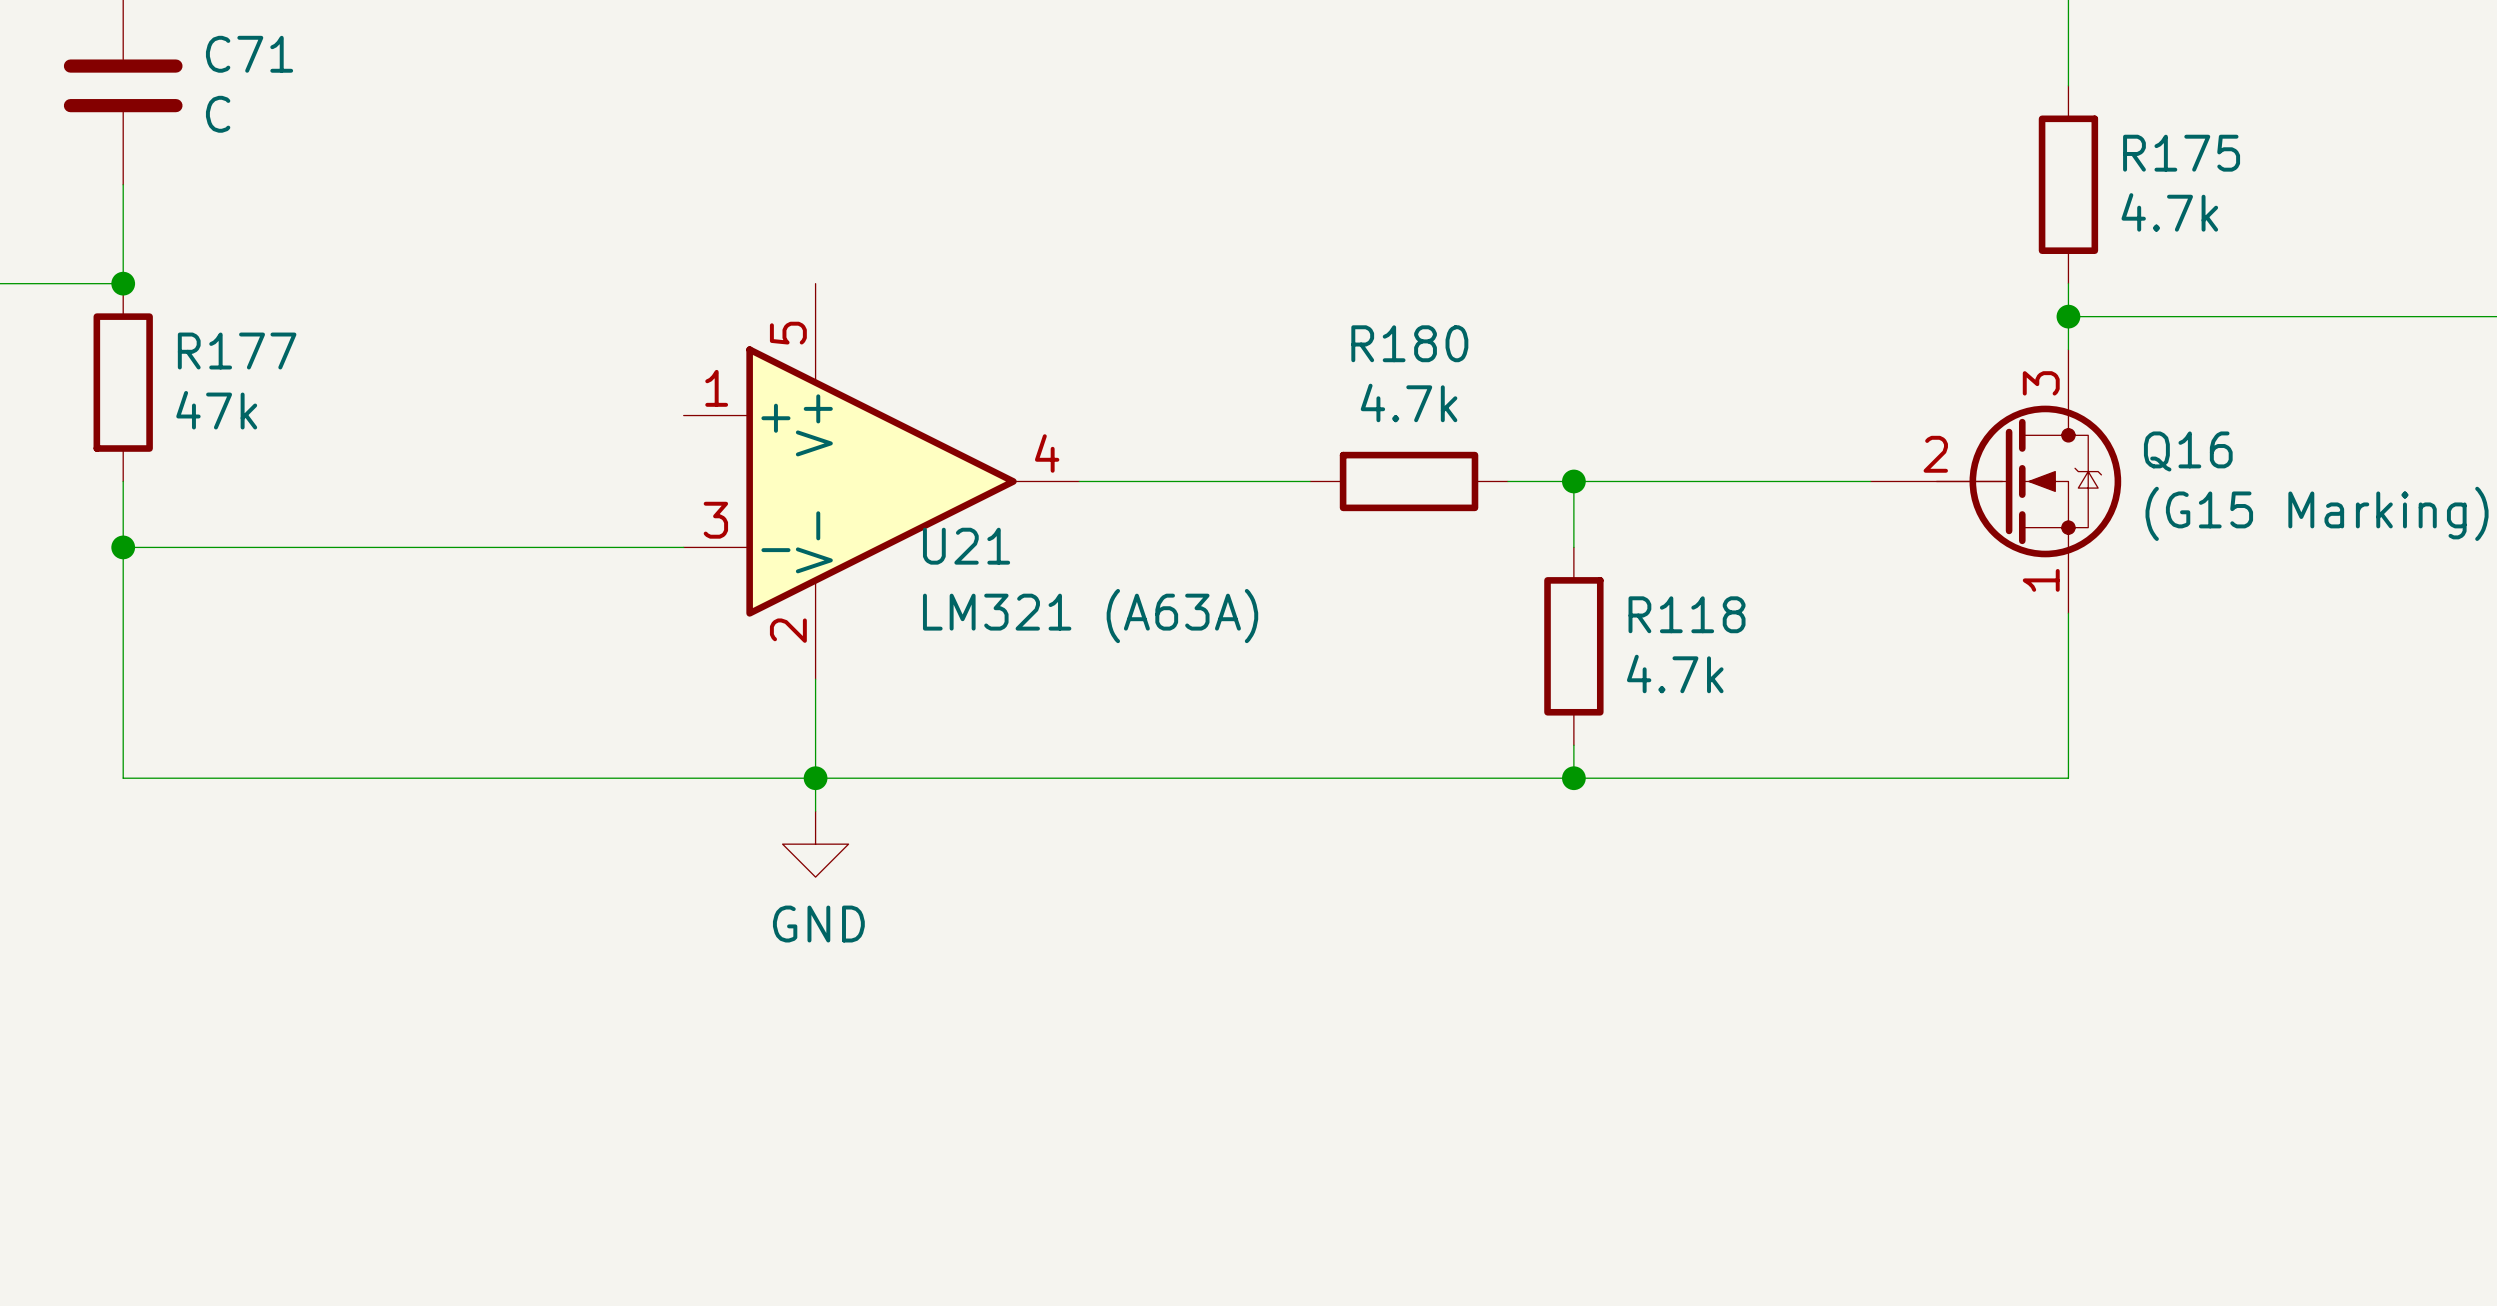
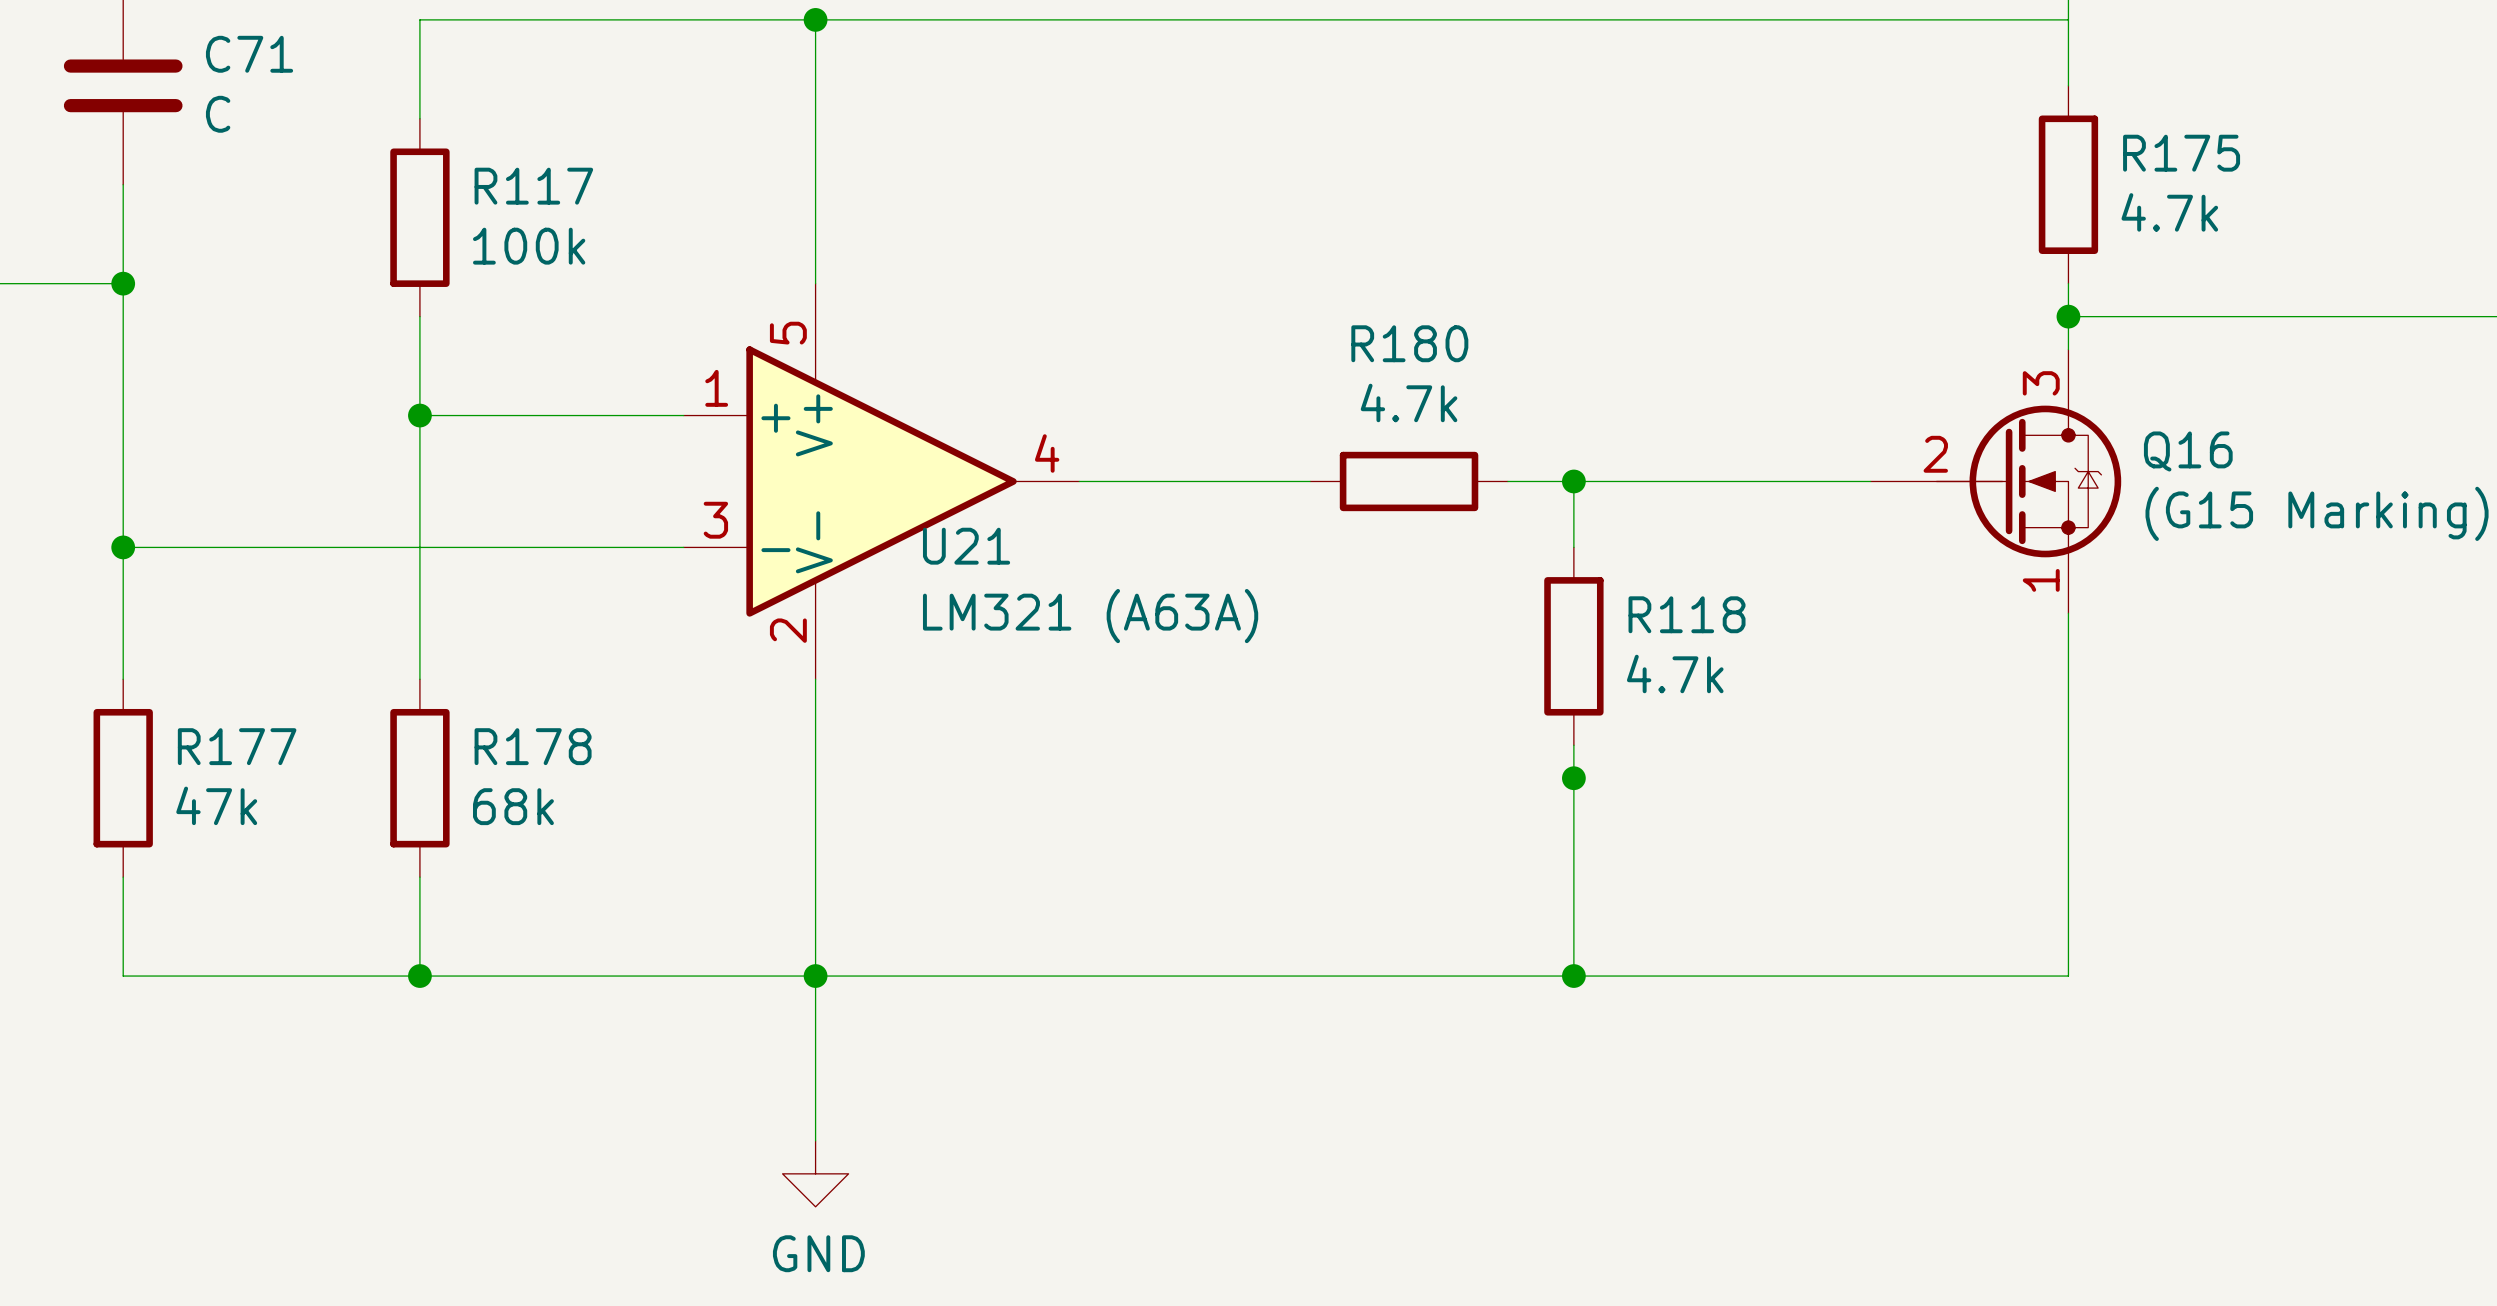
wire: none -> (815, 19) (815, 283)
junction: none -> (815, 19)
wire: none -> (2068, 19) (419, 19) (419, 118)
R117: none -> 100k (419, 217)
wire: none -> (123, 283) (123, 481)
wire: none -> (419, 316) (419, 679)
R177 position: (123, 382) -> (123, 778)
wire: none -> (419, 415) (683, 415)
junction: none -> (419, 415)
wire: (123, 679) (123, 778) (2068, 778) -> (123, 877) (123, 976) (2068, 976) (2068, 778)
R178: none -> 68k (419, 778)
junction: (815, 778) -> none
wire: none -> (1573, 778) (1573, 976)
wire: none -> (815, 811) (815, 1140)
power symbol position: GND (815, 844) -> GND (815, 1173)
wire: none -> (419, 877) (419, 976)
junction: none -> (419, 976)
junction: none -> (815, 976)
junction: none -> (1573, 976)

